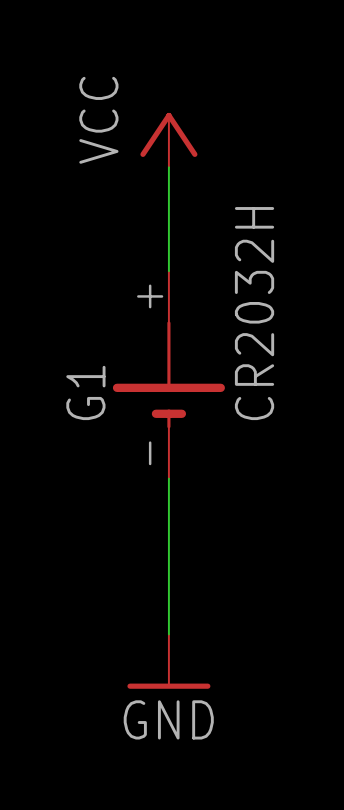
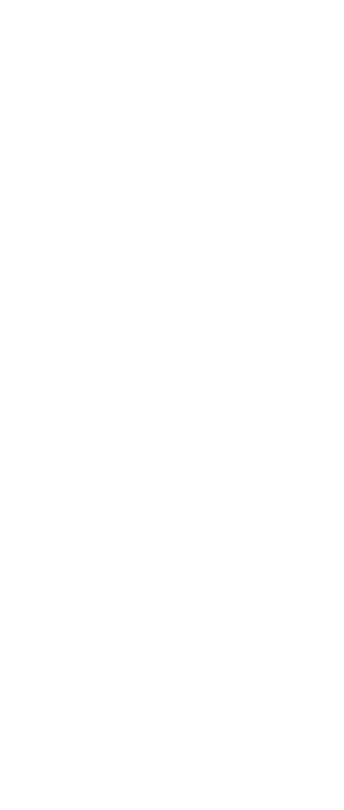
power symbol: VCC (168, 140) -> none
wire: (168, 167) (168, 271) -> none
G1: CR2032H (168, 374) -> none
wire: (168, 478) (168, 634) -> none
power symbol: GND (168, 661) -> none

